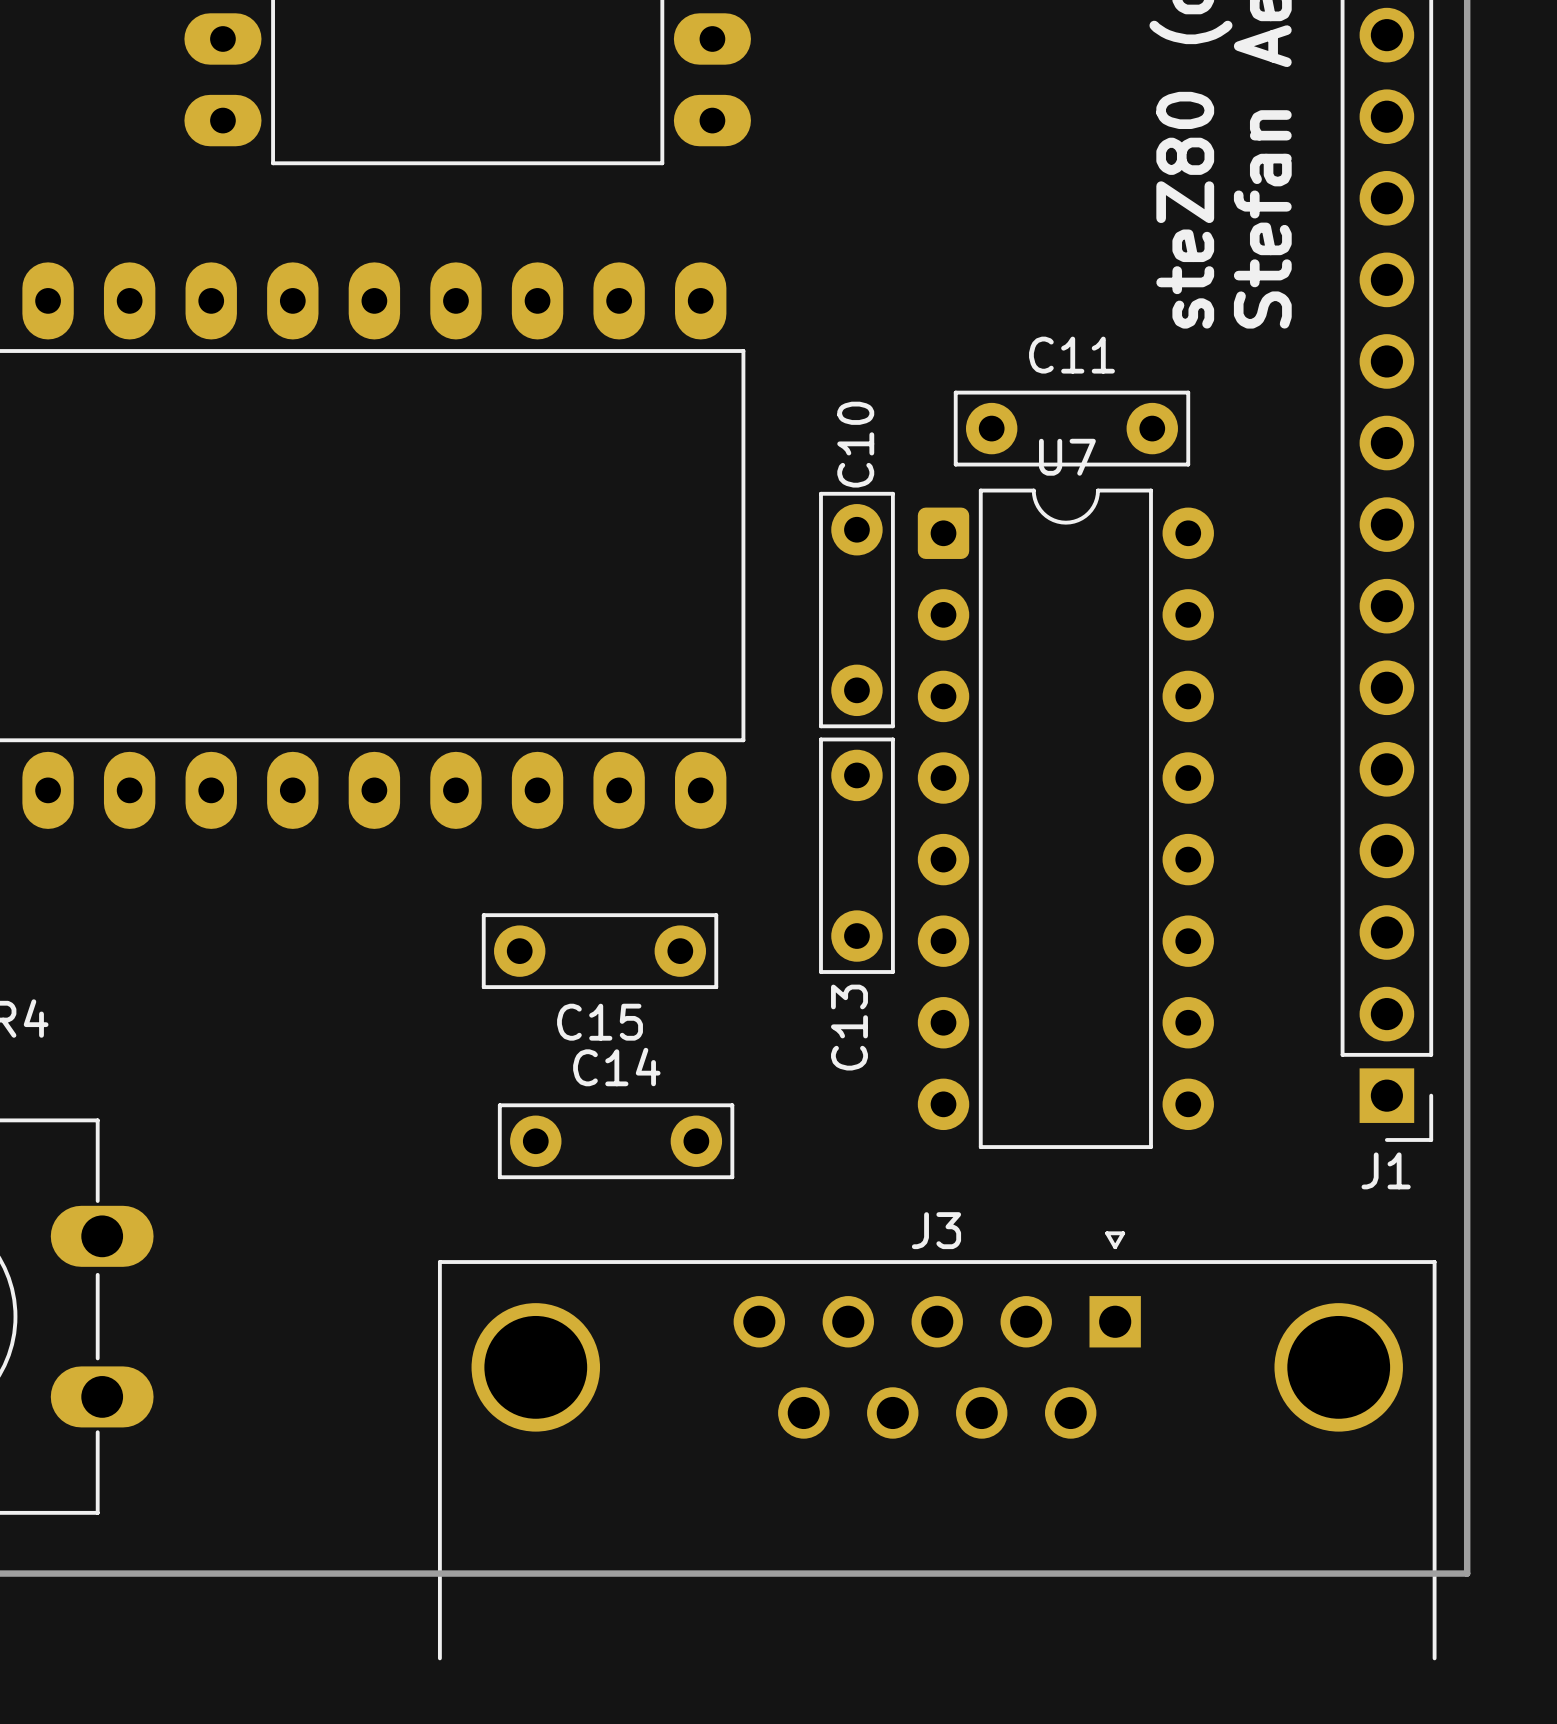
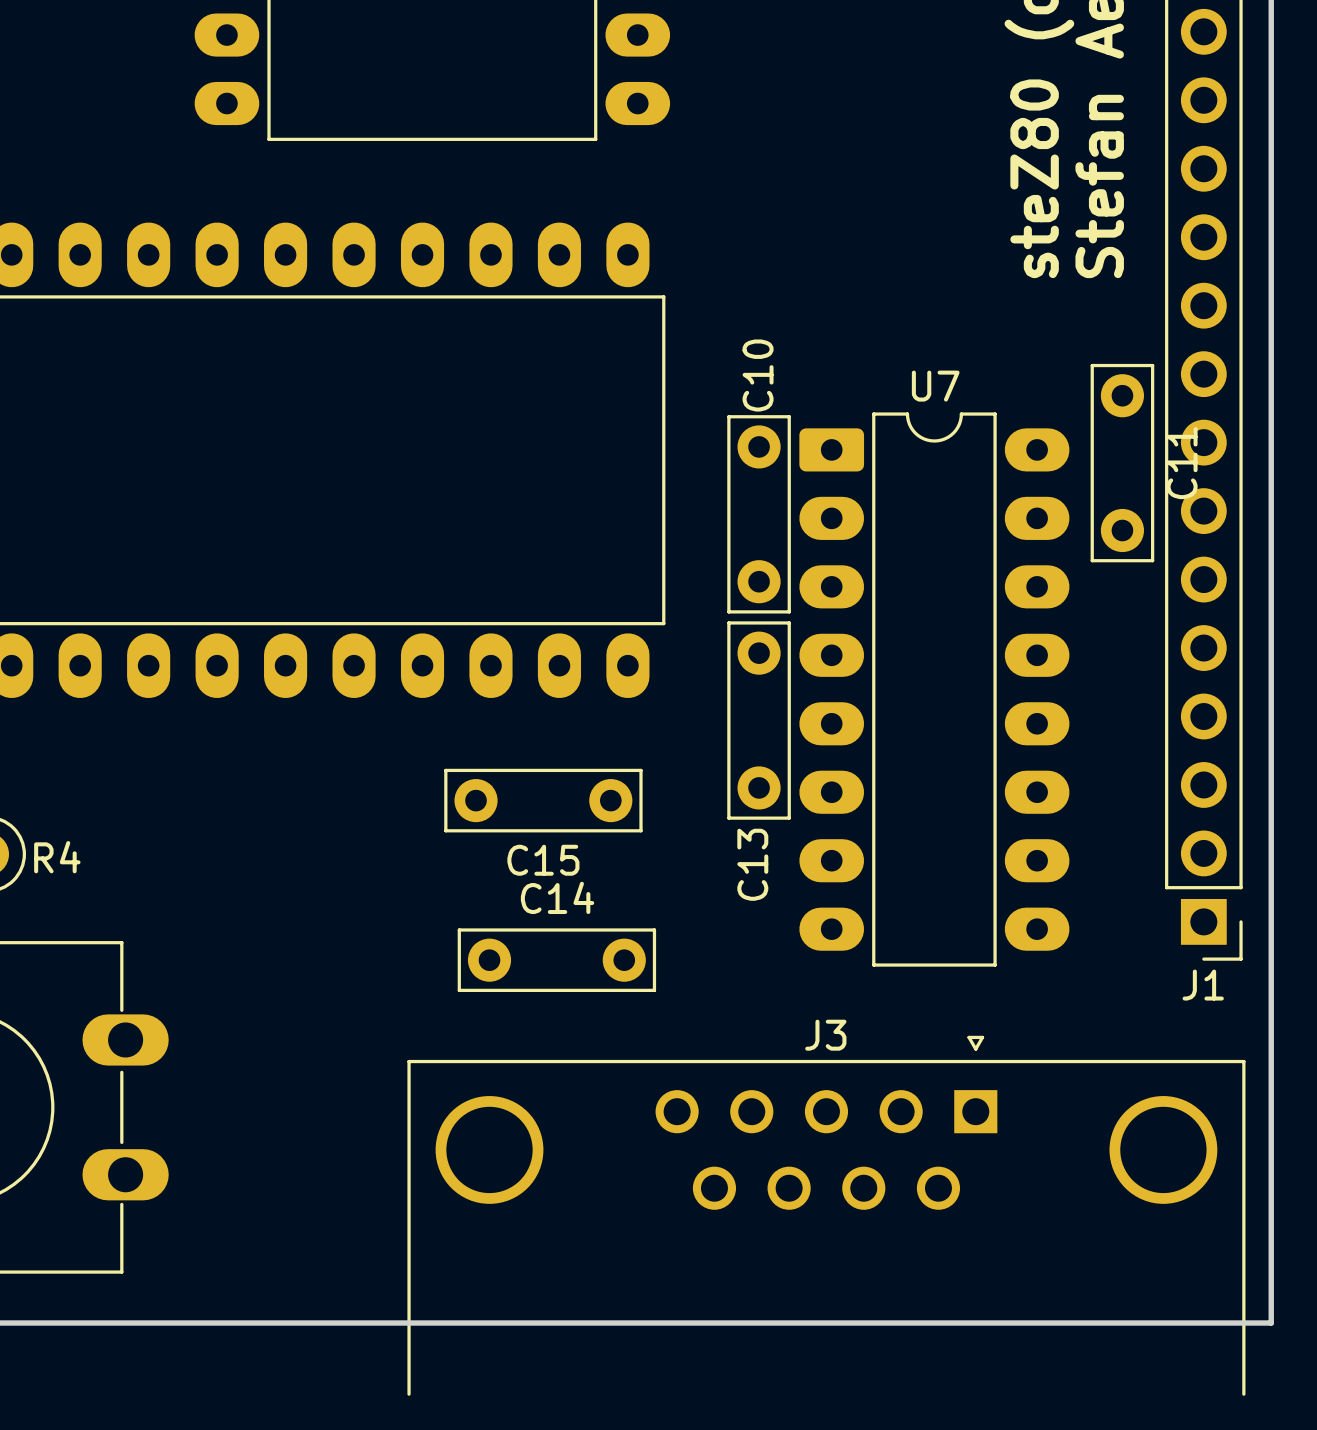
C11 rotation: 0° (1071, 428) -> 90° clockwise (1122, 463)
C11 position: (1071, 428) -> (1122, 463)
U7 footprint: [917, 488, 1214, 1149] -> [799, 412, 1070, 967]

